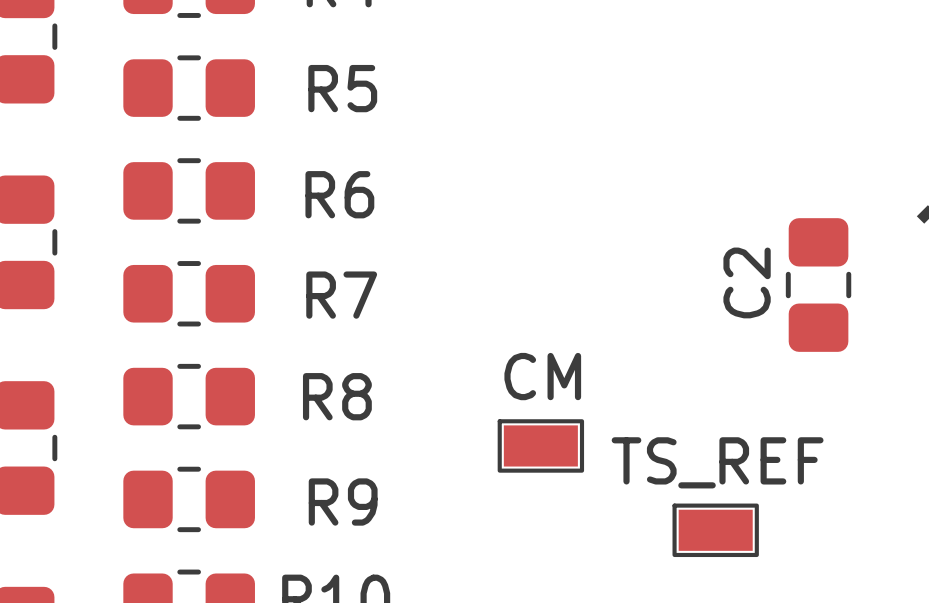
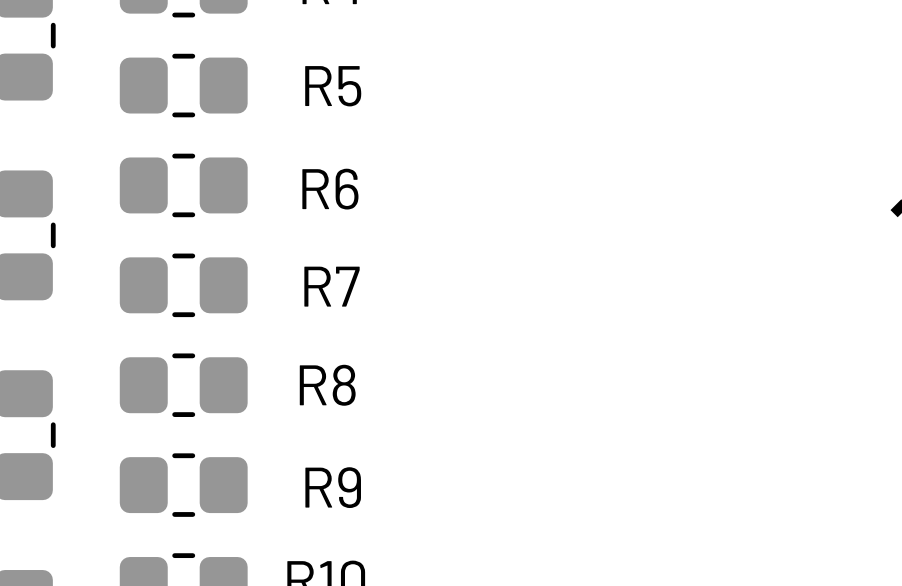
C2: (818, 285) -> none
part: CM (540, 445) -> none
part: TS_REF (715, 530) -> none

